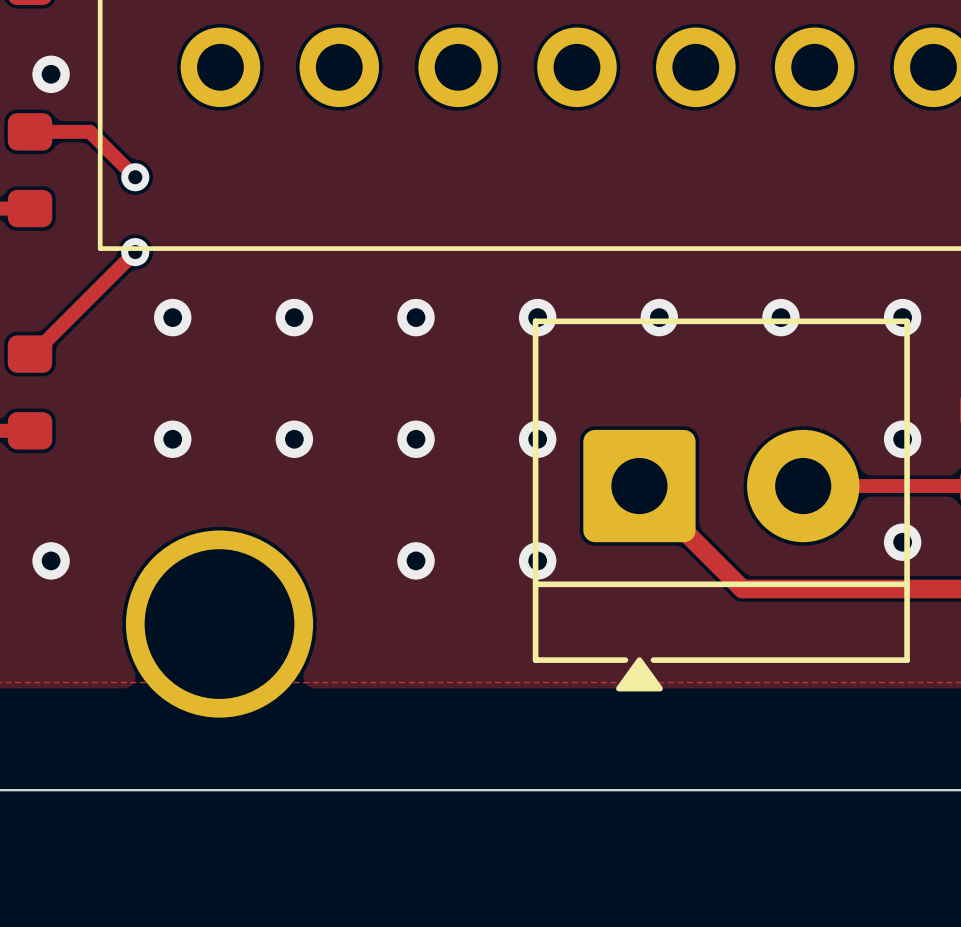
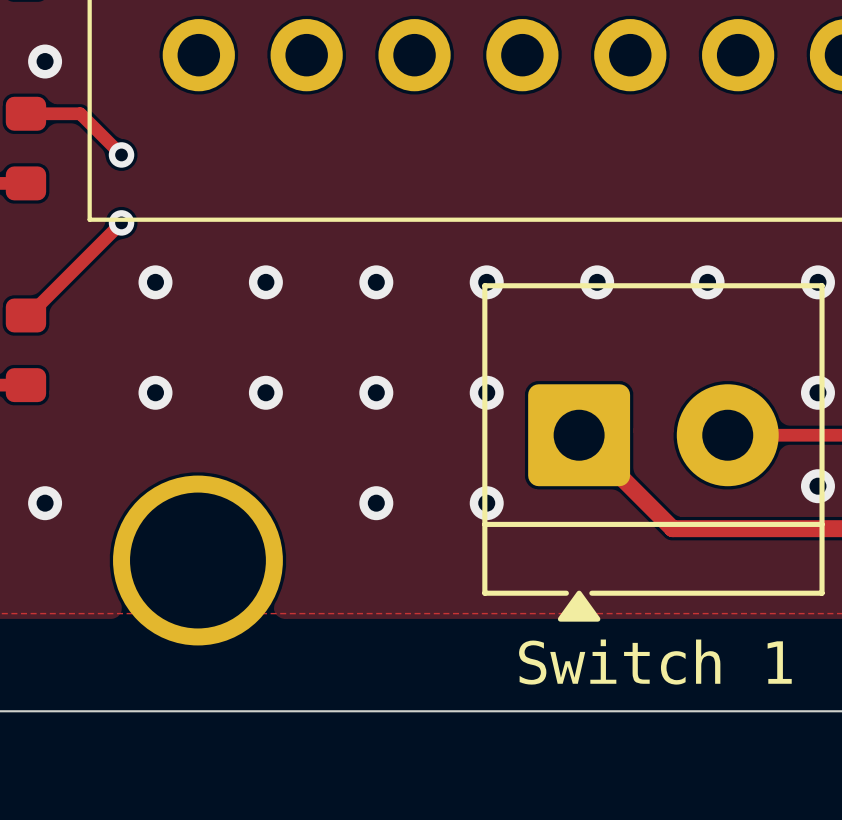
text: none -> Switch 1 (655, 662)

